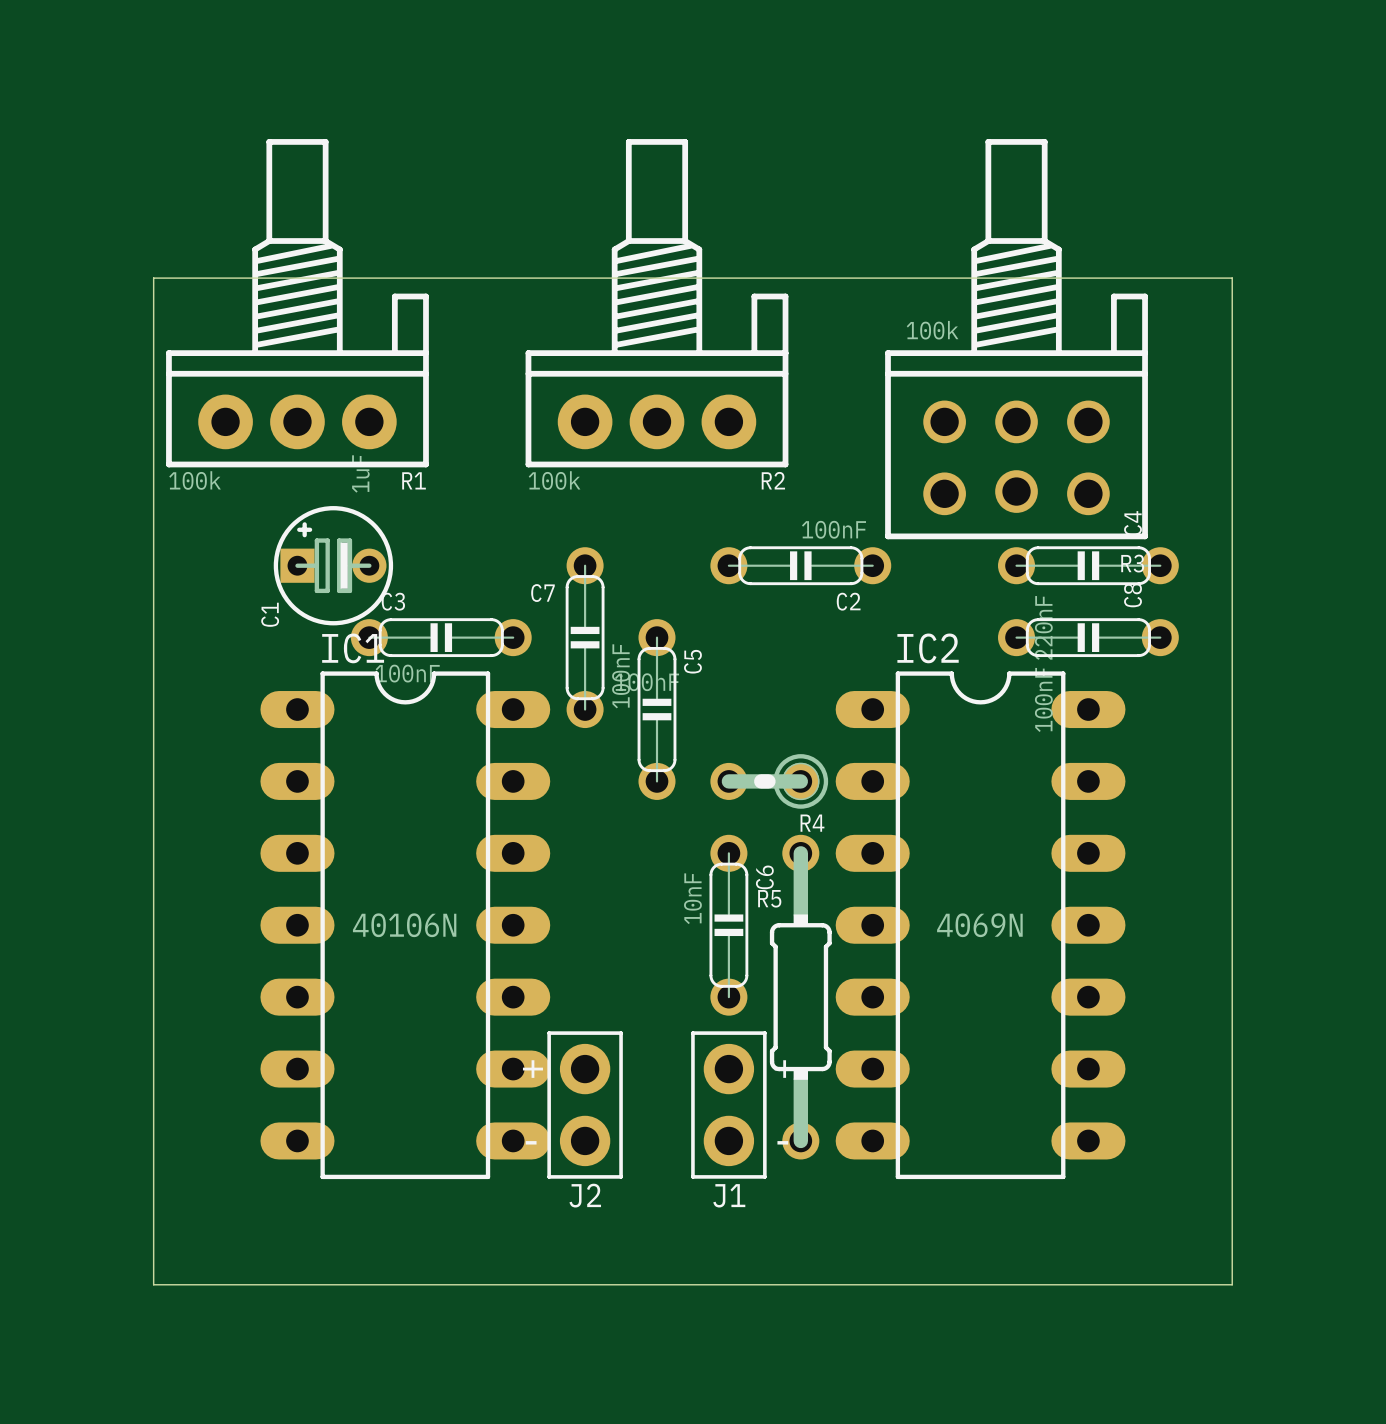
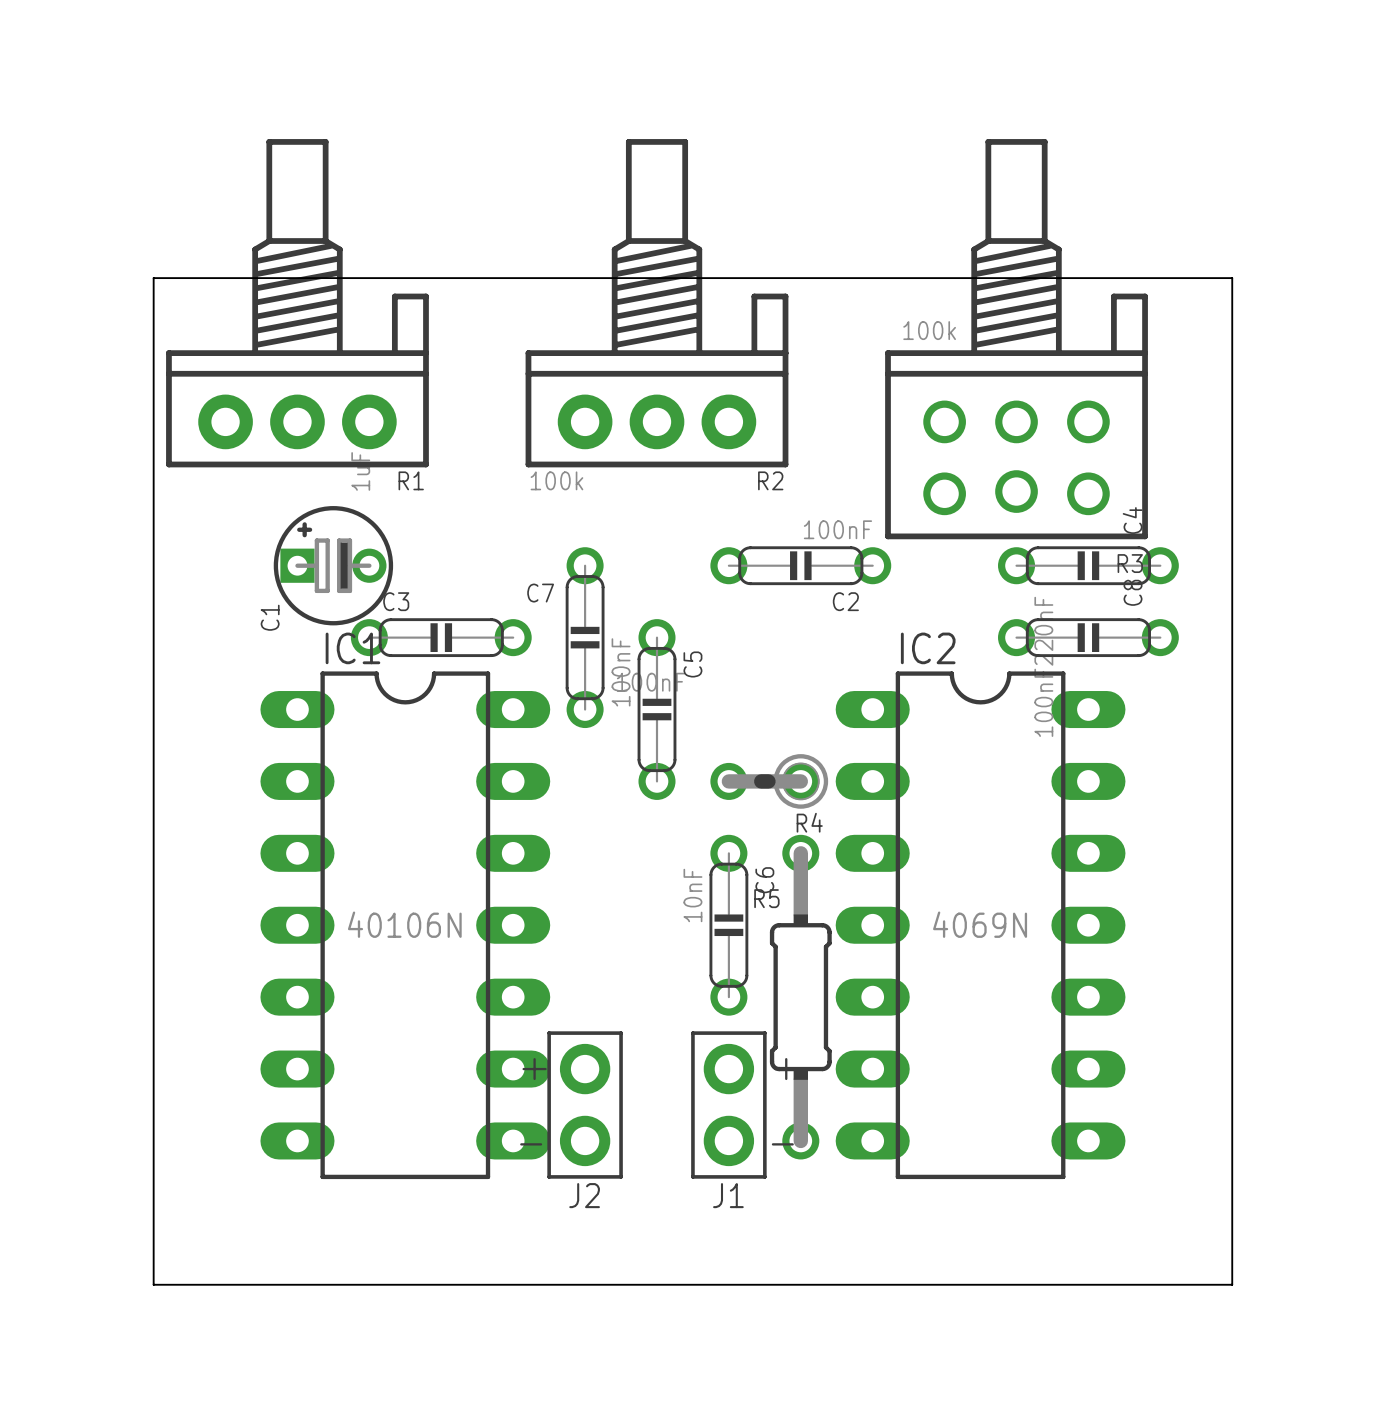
R1 value: 100k (195, 480) -> none
C3 value: 100nF (407, 673) -> none

